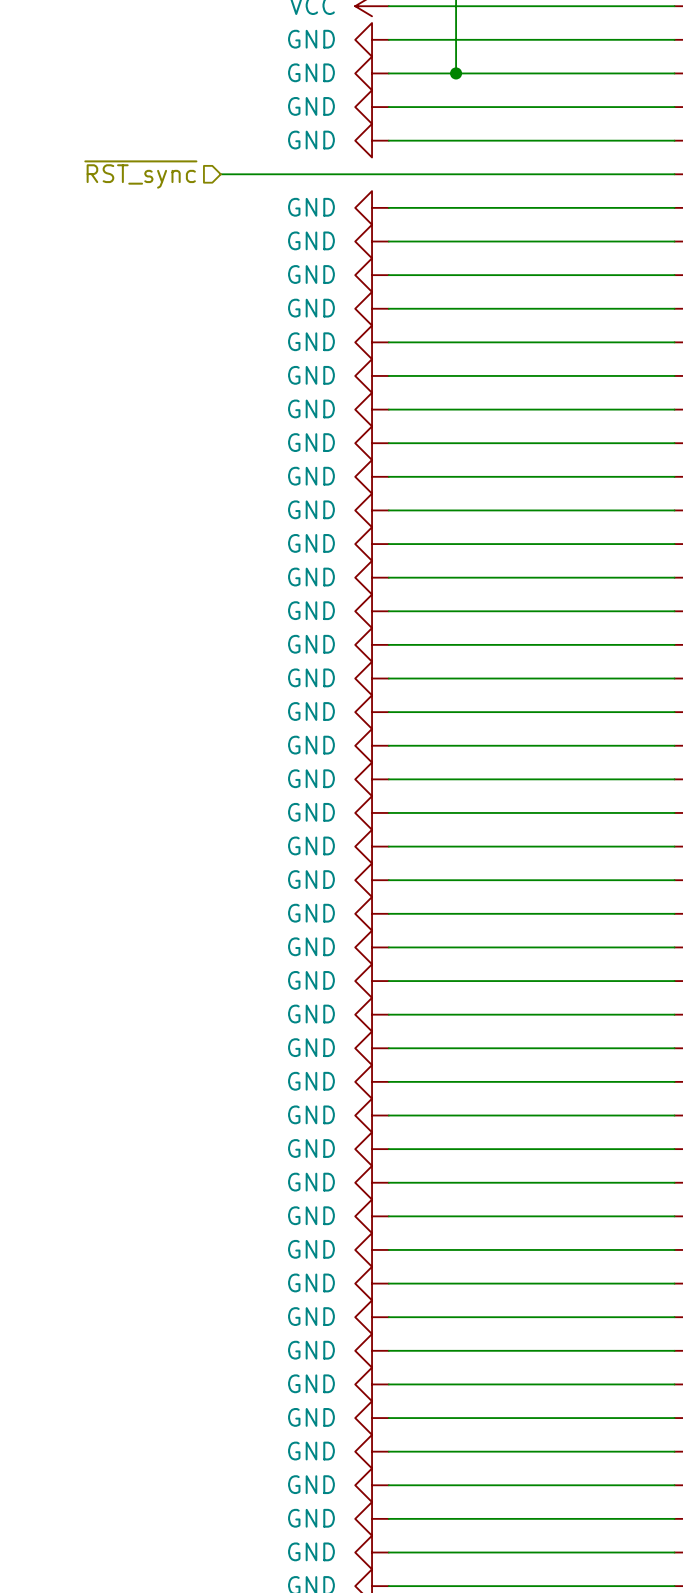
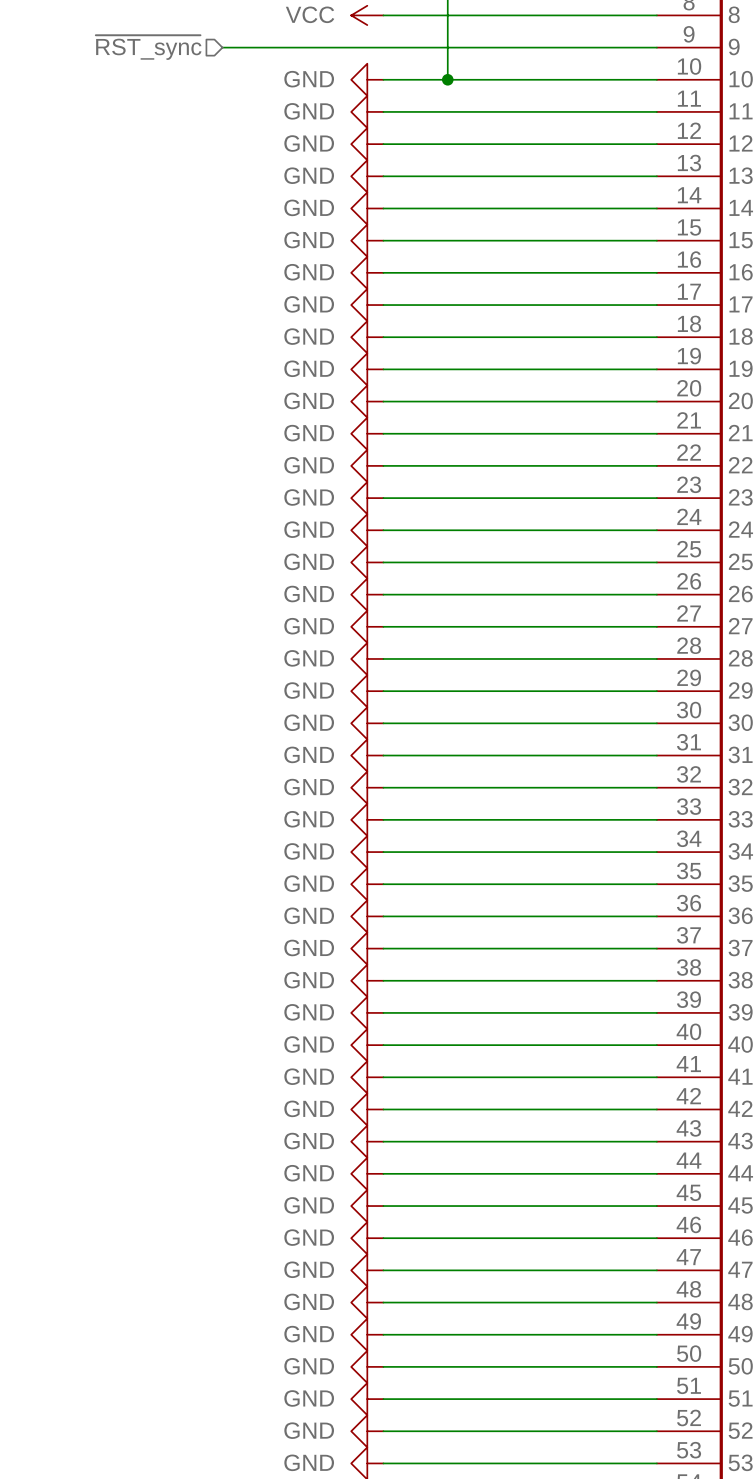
power symbol position: GND (372, 39) -> GND (367, 176)
hierarchical label position: ~{RST_sync} (140, 174) -> ~{RST_sync} (148, 47)
wire: (220, 174) (388, 174) -> (222, 47) (383, 47)

